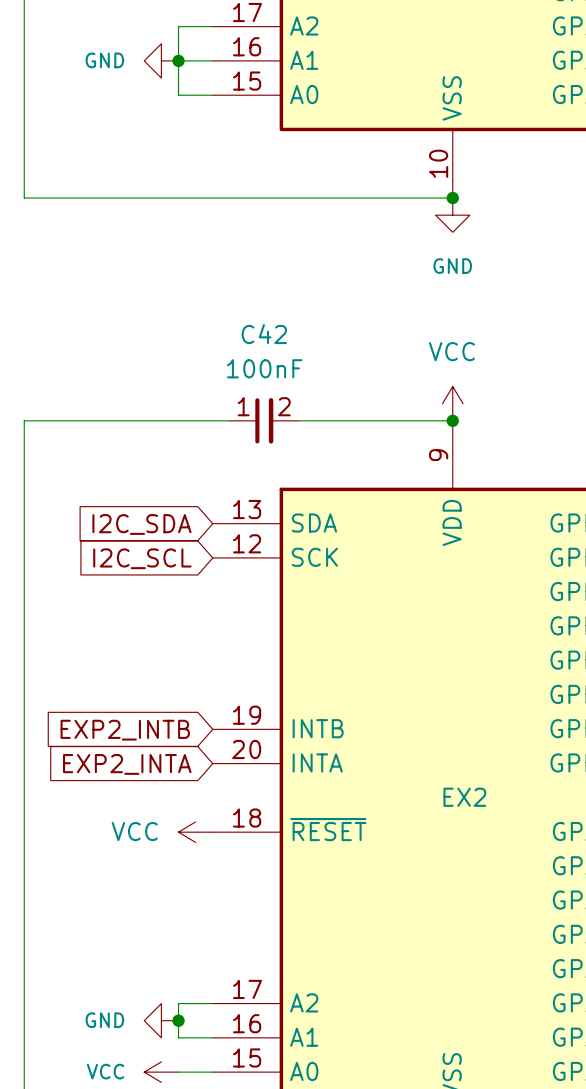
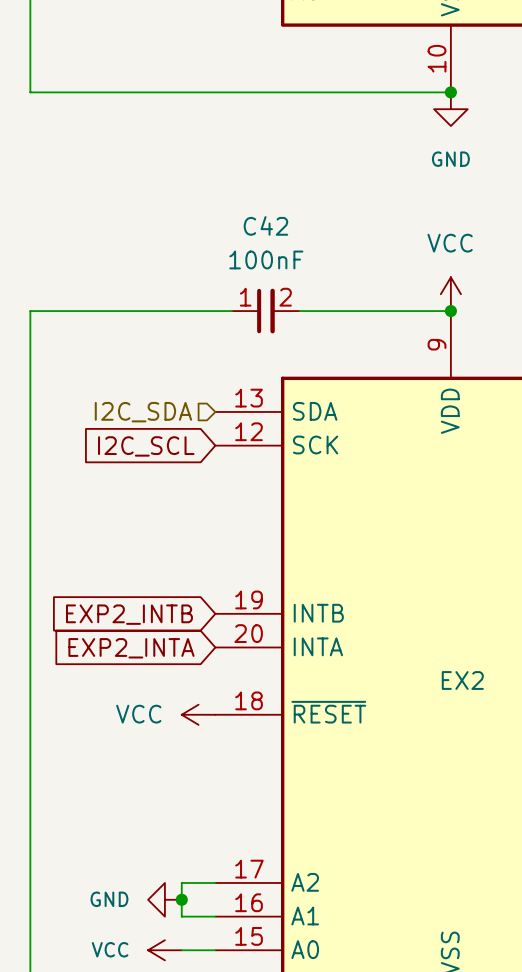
hierarchical label: none -> I2C_SDA (143, 412)
global label: I2C_SDA (141, 524) -> none

